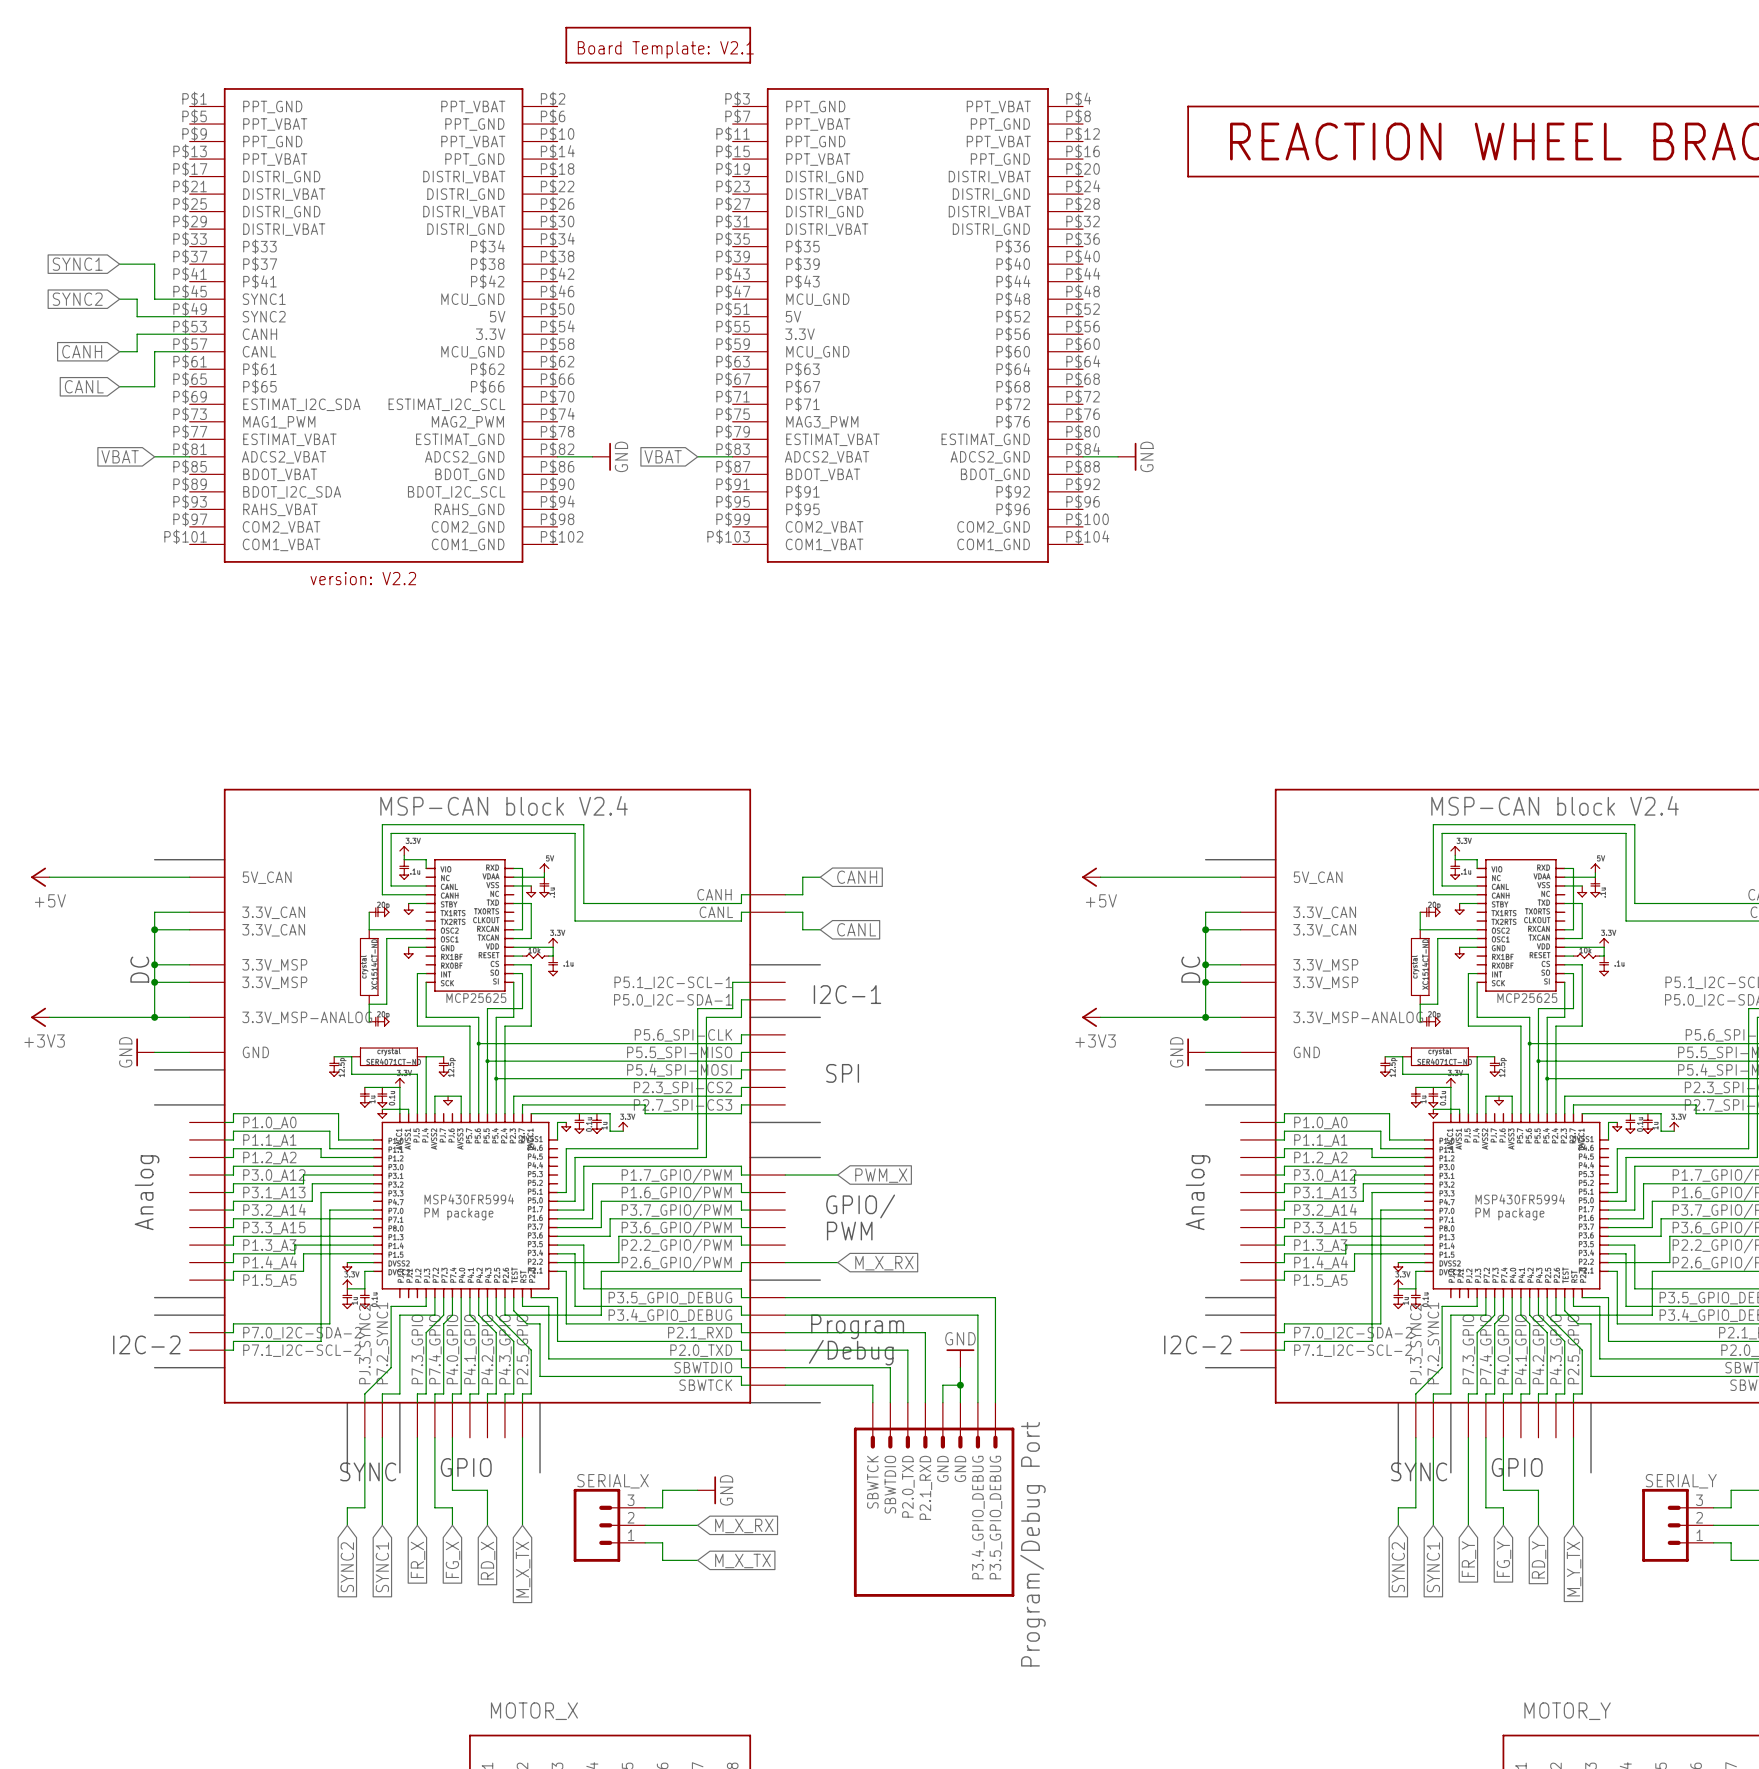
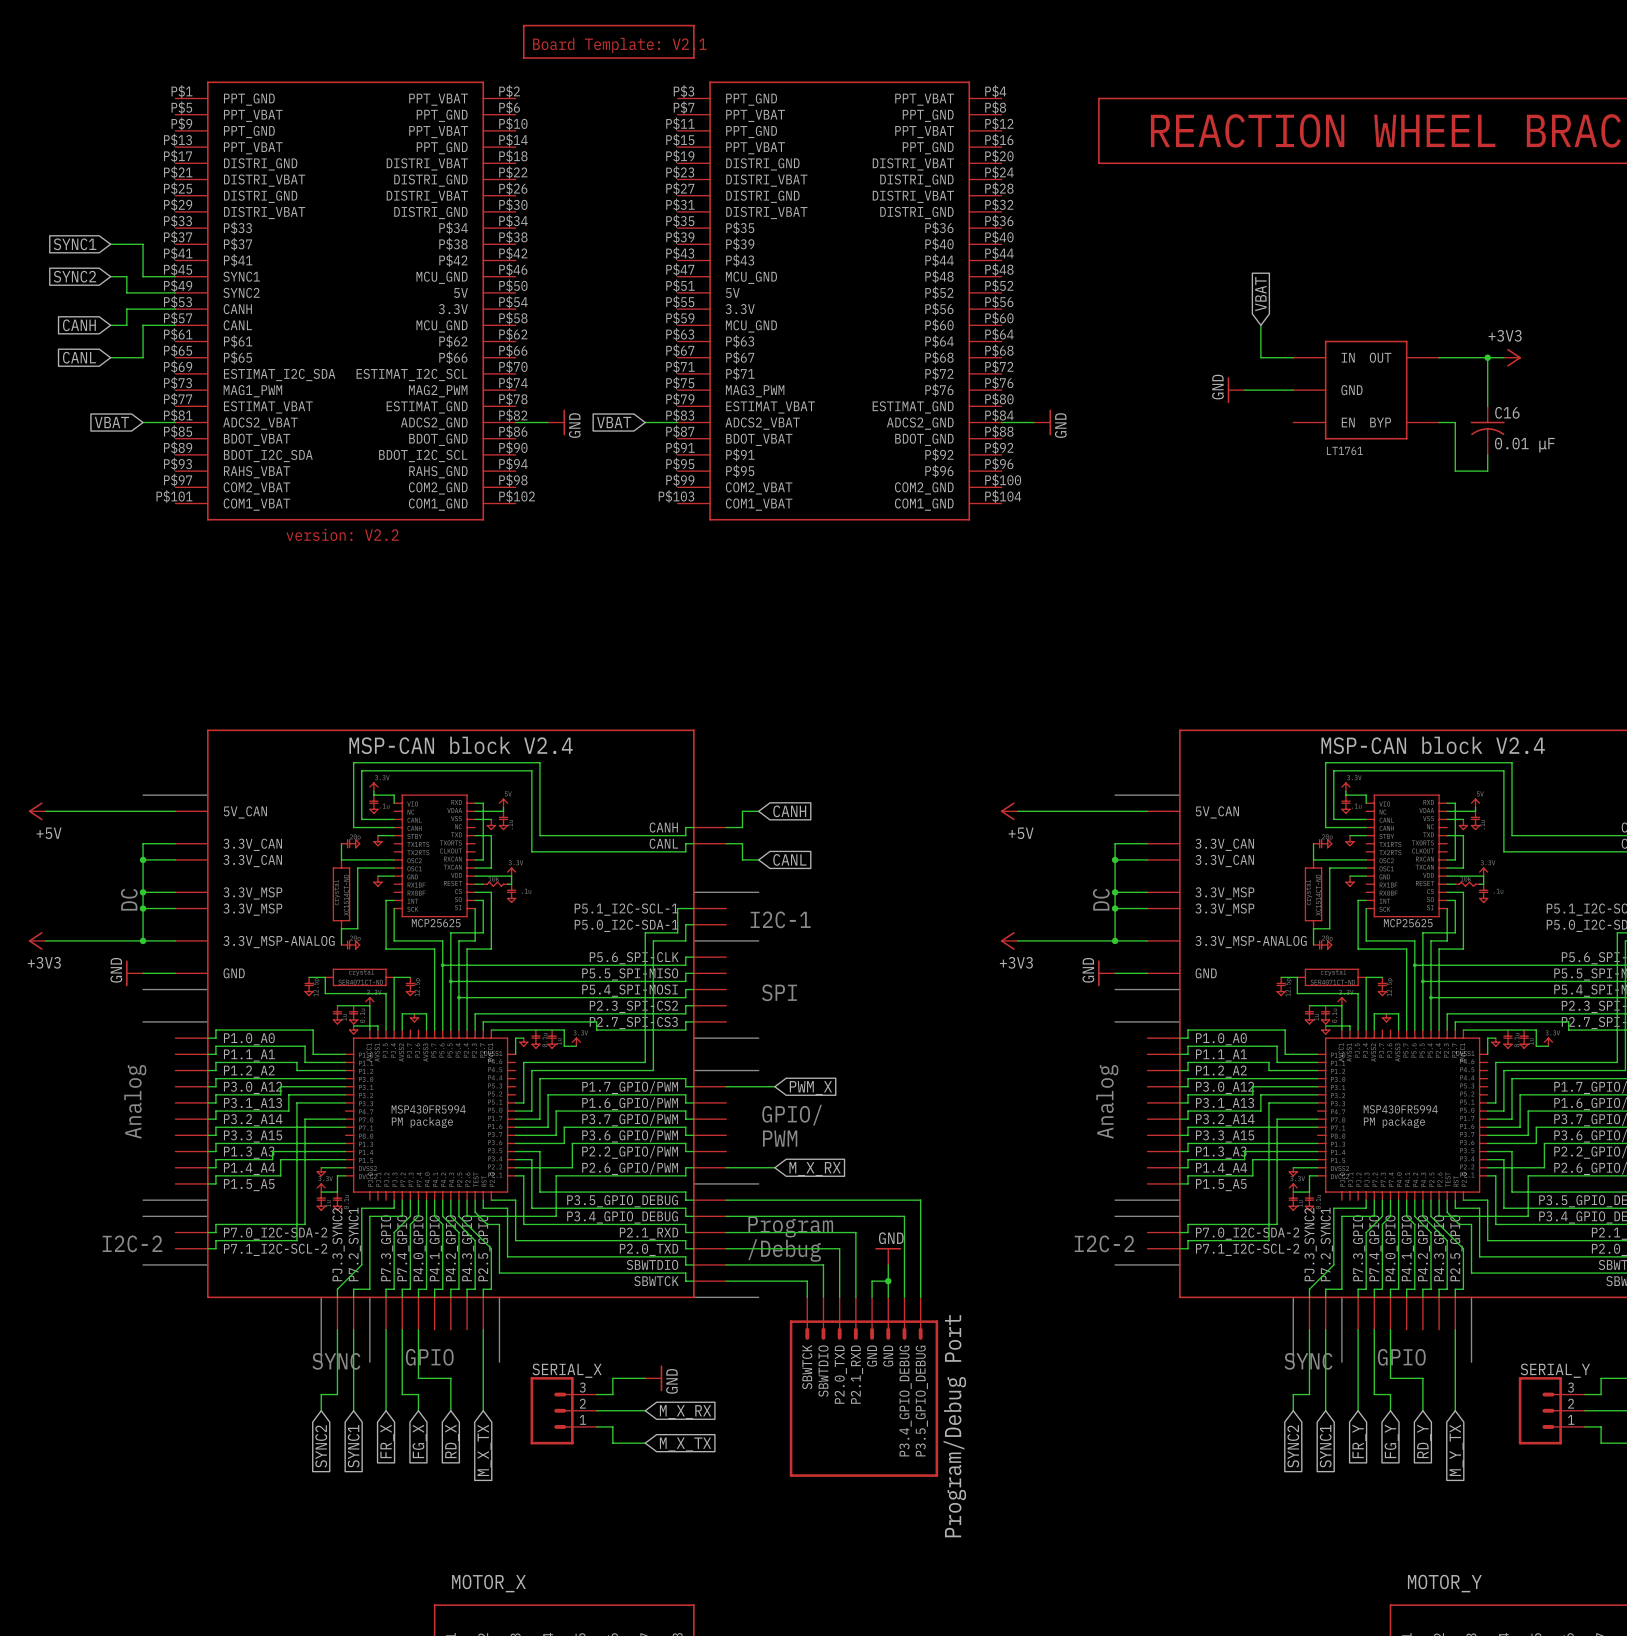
global label: none -> VBAT (1260, 294)
wire: none -> (1260, 325) (1260, 357) (1293, 357)
wire: none -> (1439, 357) (1503, 357)
wire: none -> (1487, 357) (1487, 406)
junction: none -> (1487, 357)
power symbol: none -> +3V3 (1512, 357)
power symbol: none -> GND (1236, 390)
wire: none -> (1244, 390) (1293, 390)
part: none -> (1366, 390)
wire: none -> (1439, 422) (1455, 422) (1455, 471) (1487, 471) (1487, 454)
C16: none -> 0.01 μF (1487, 430)

